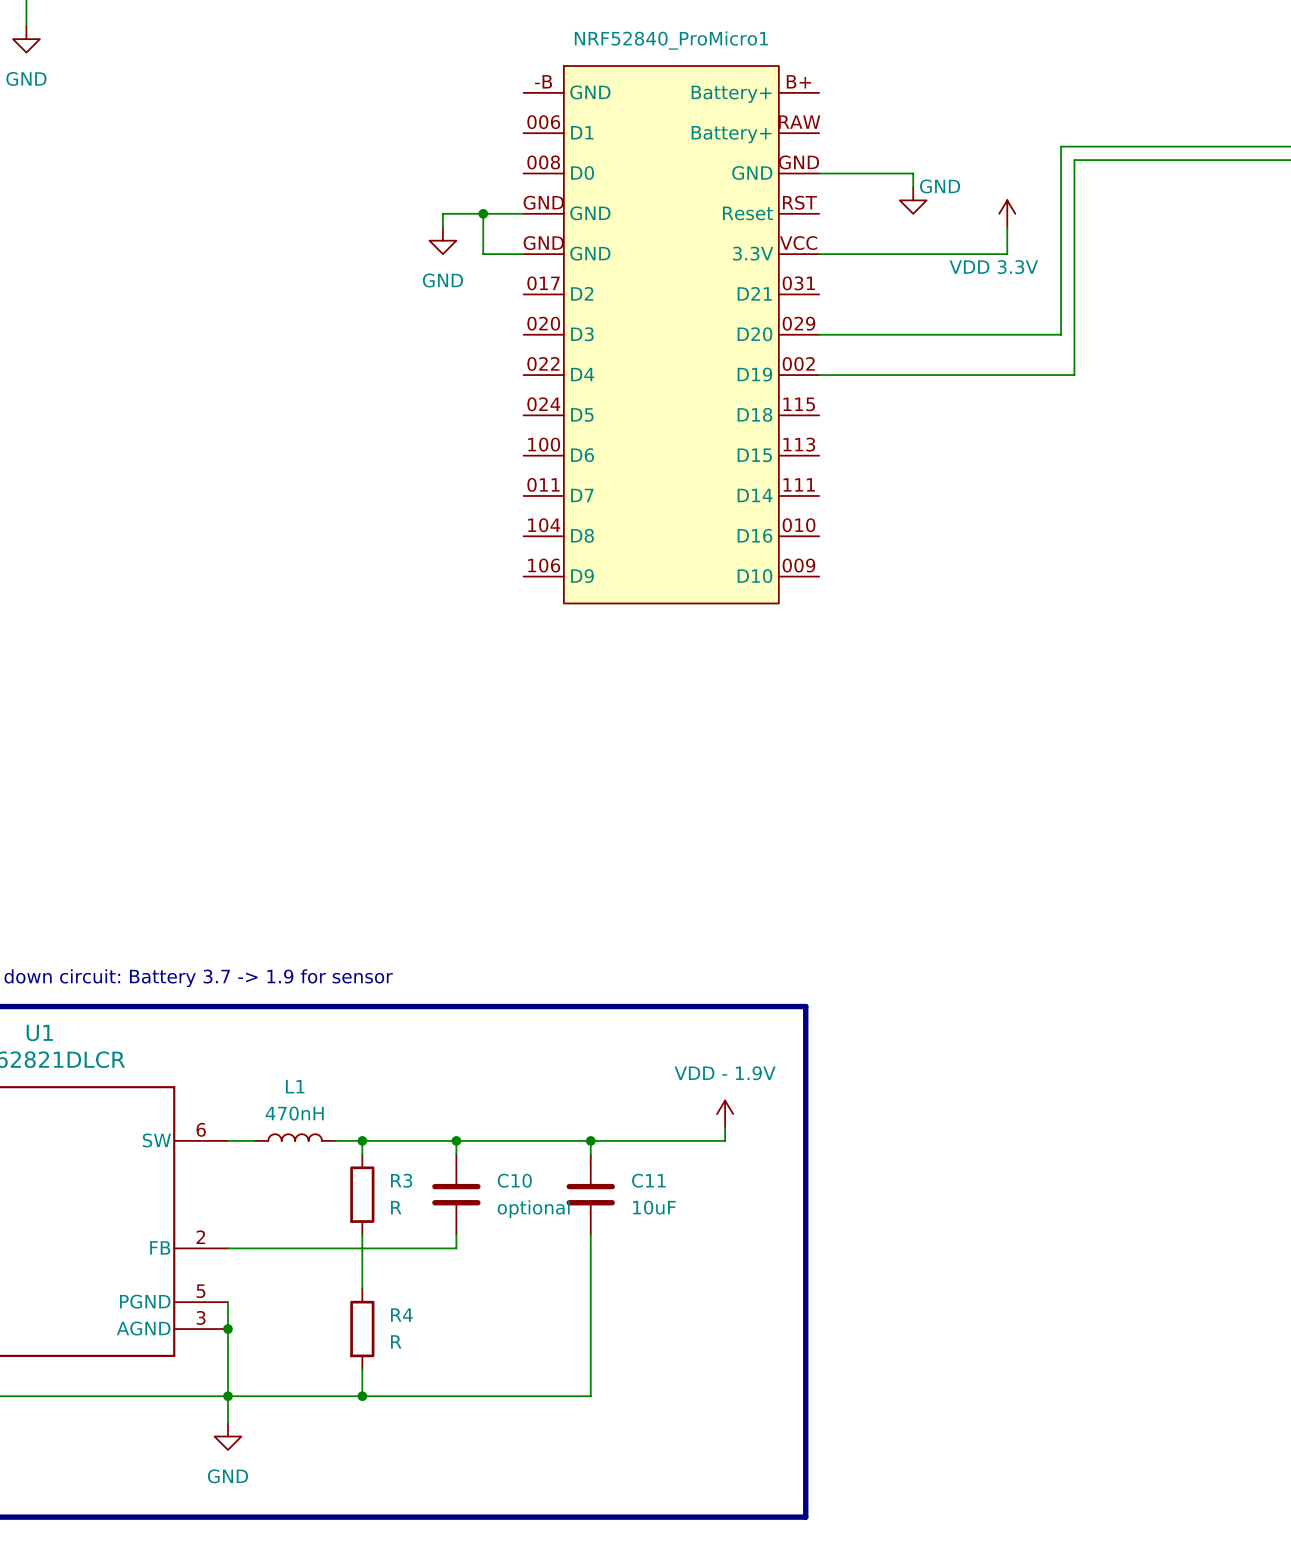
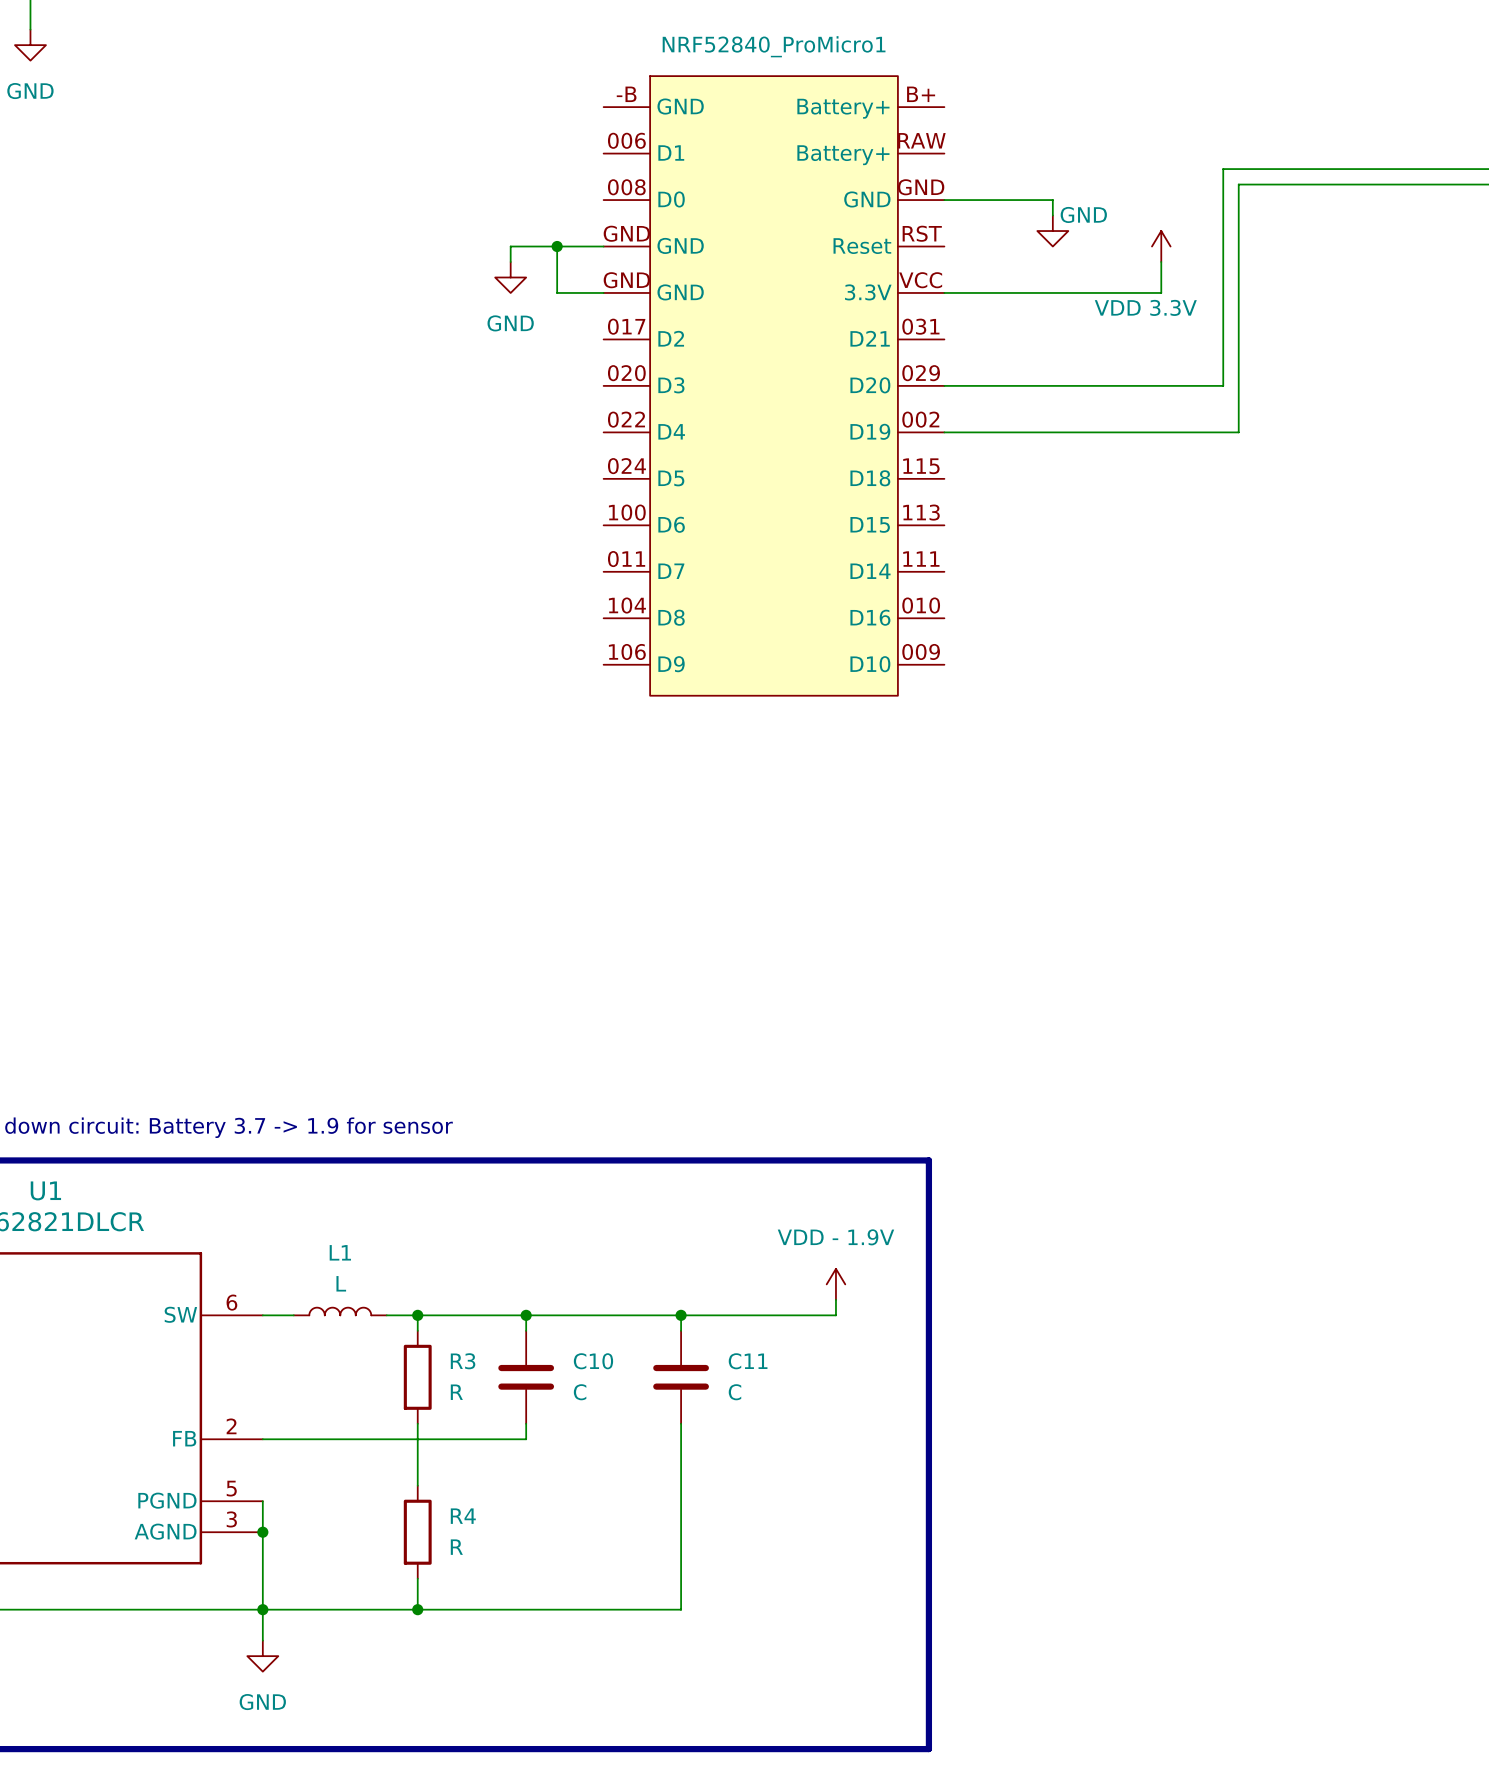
L1 value: 470nH (294, 1113) -> L (341, 1283)
C11 value: 10uF (654, 1207) -> C (734, 1392)
C10 value: optional (533, 1209) -> C (580, 1392)

